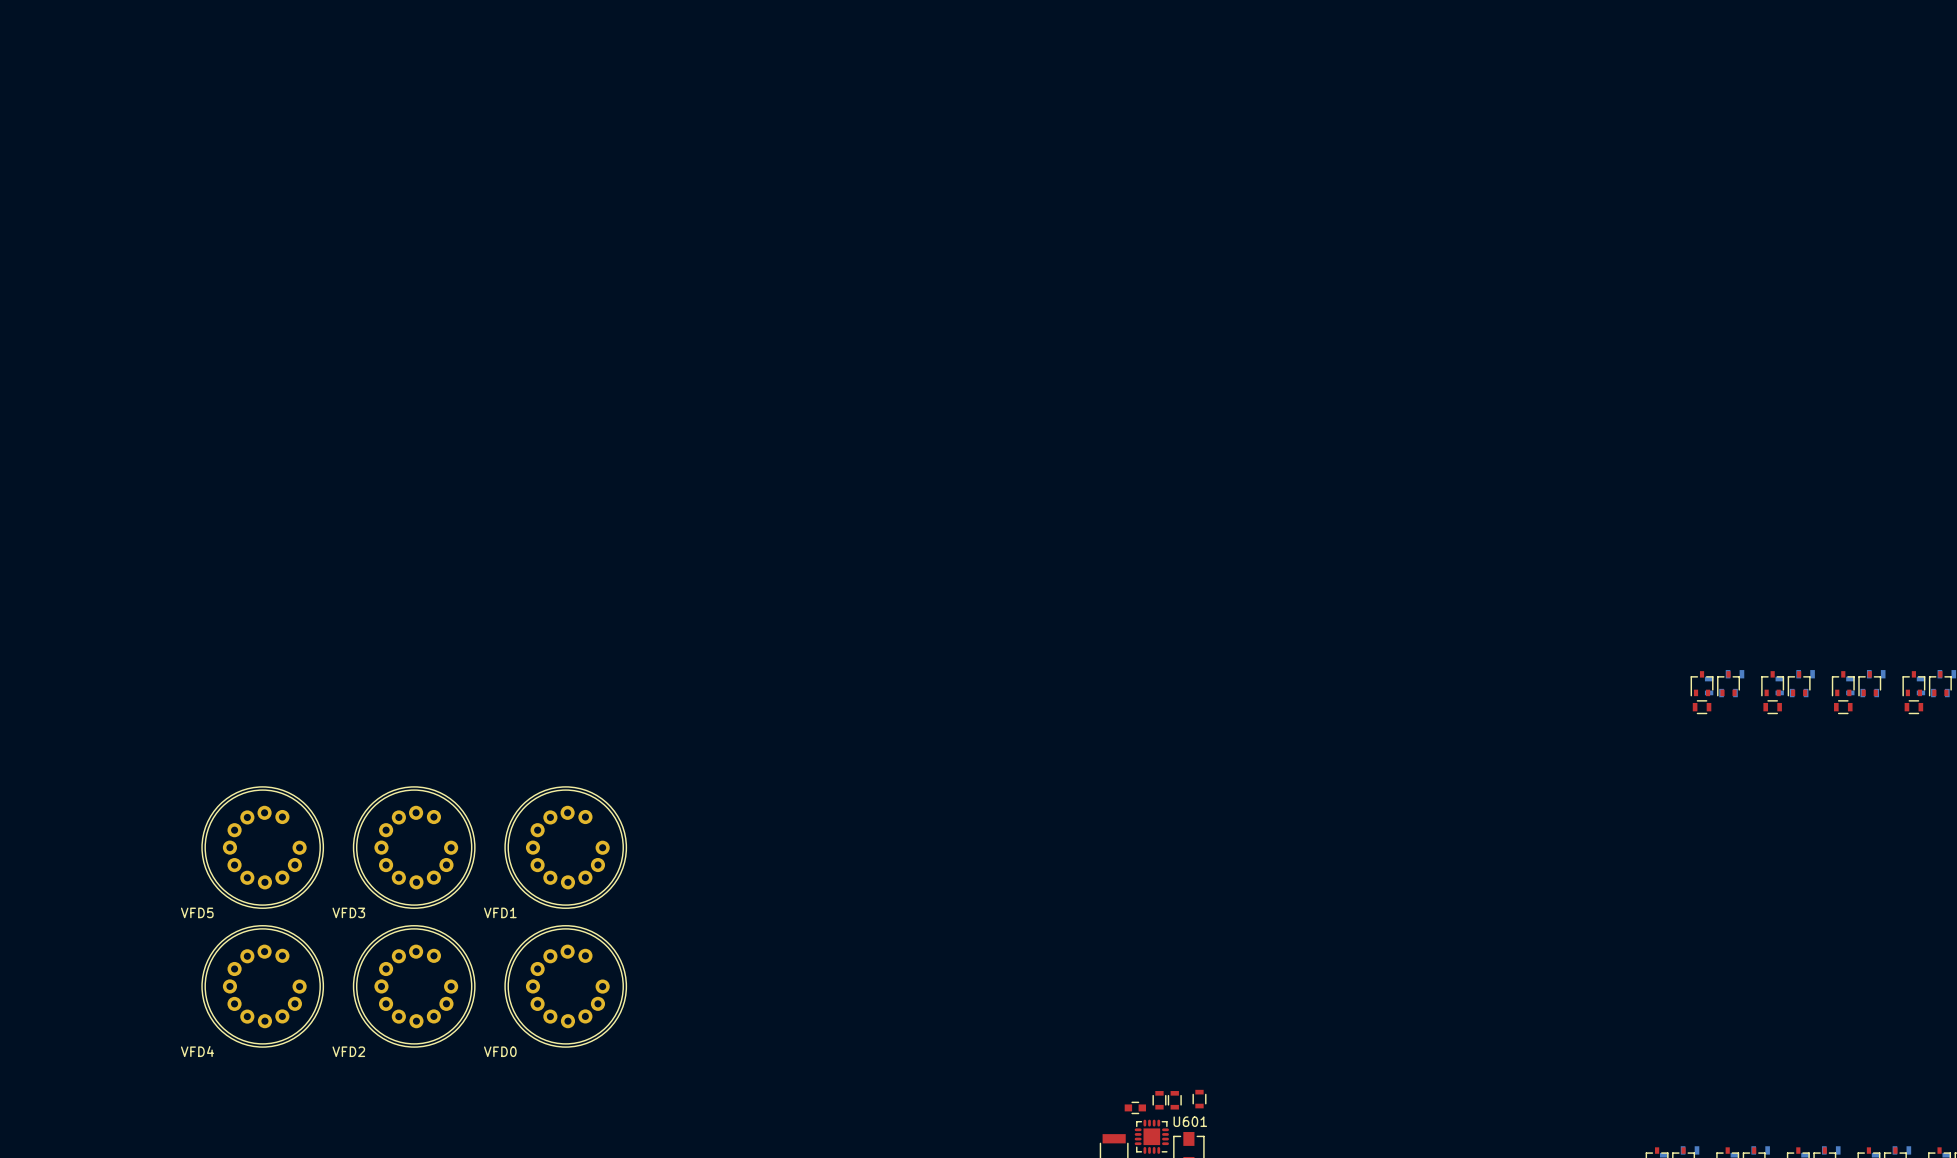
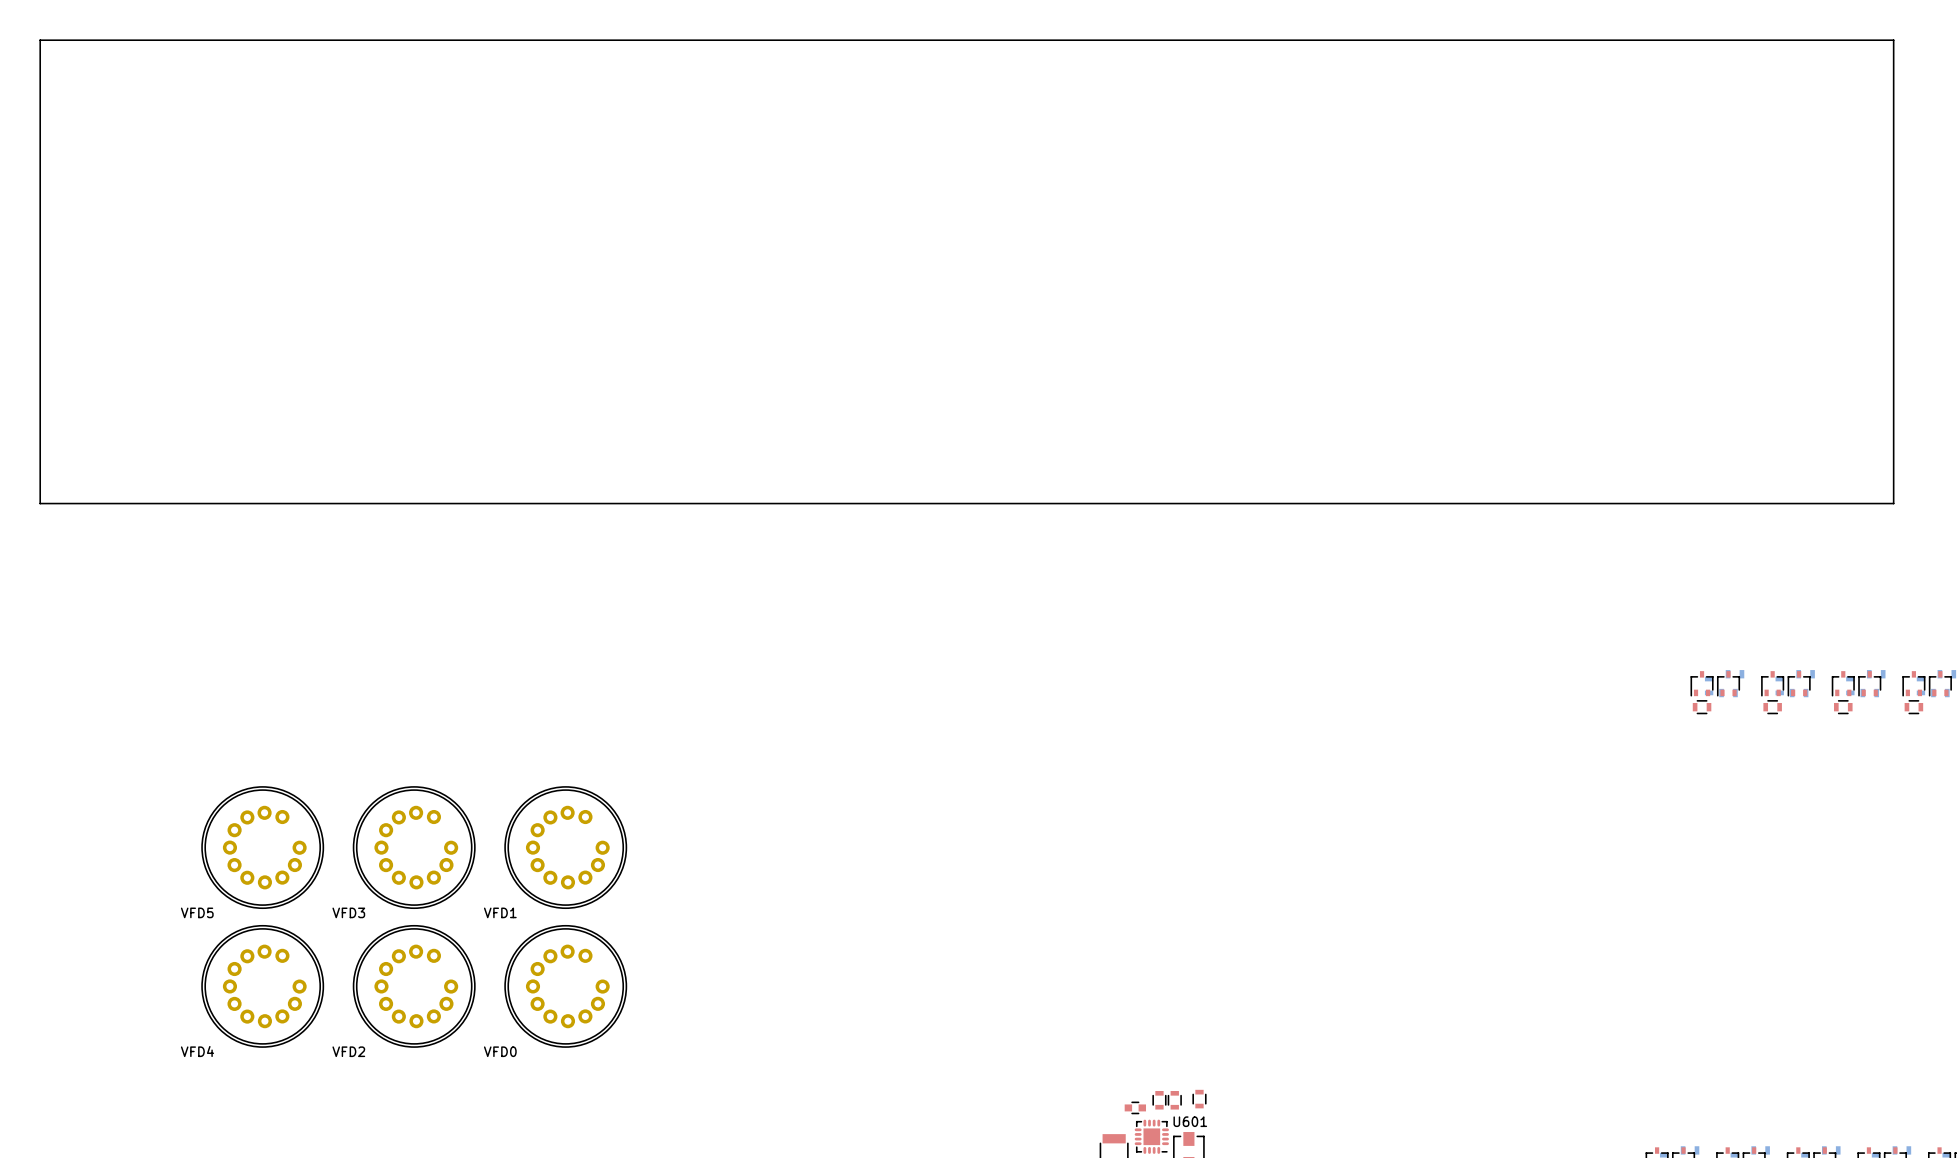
board edge: none -> (40, 40) (40, 503) (1893, 503) (1893, 40) (40, 40)

